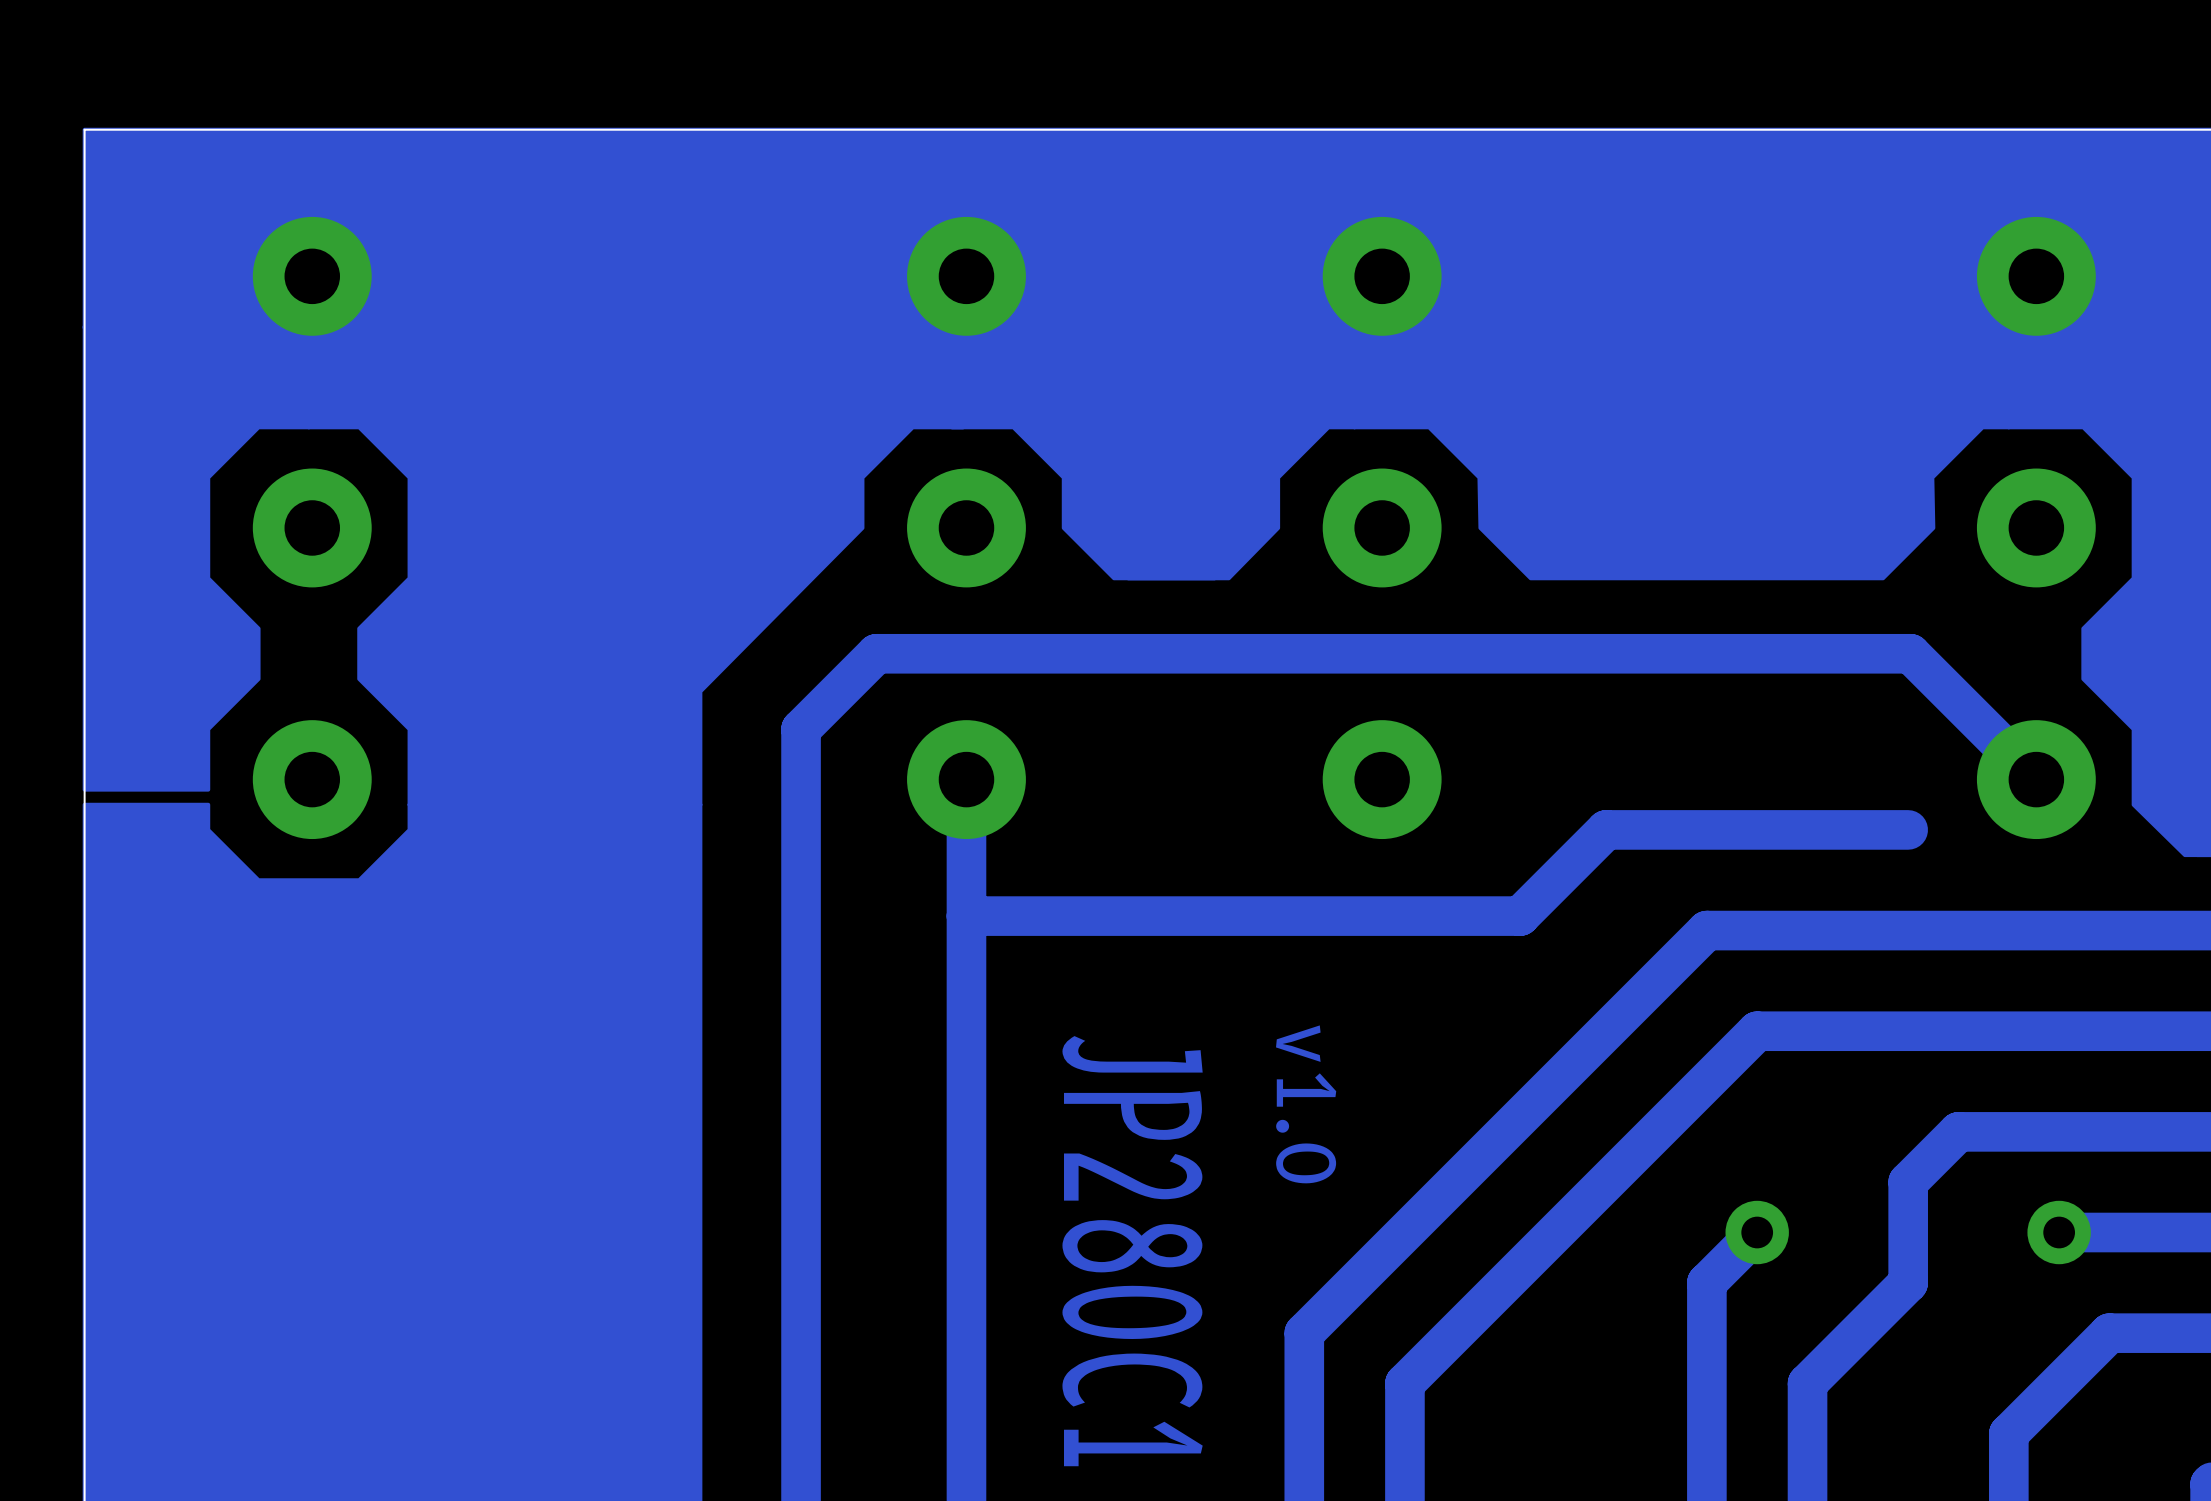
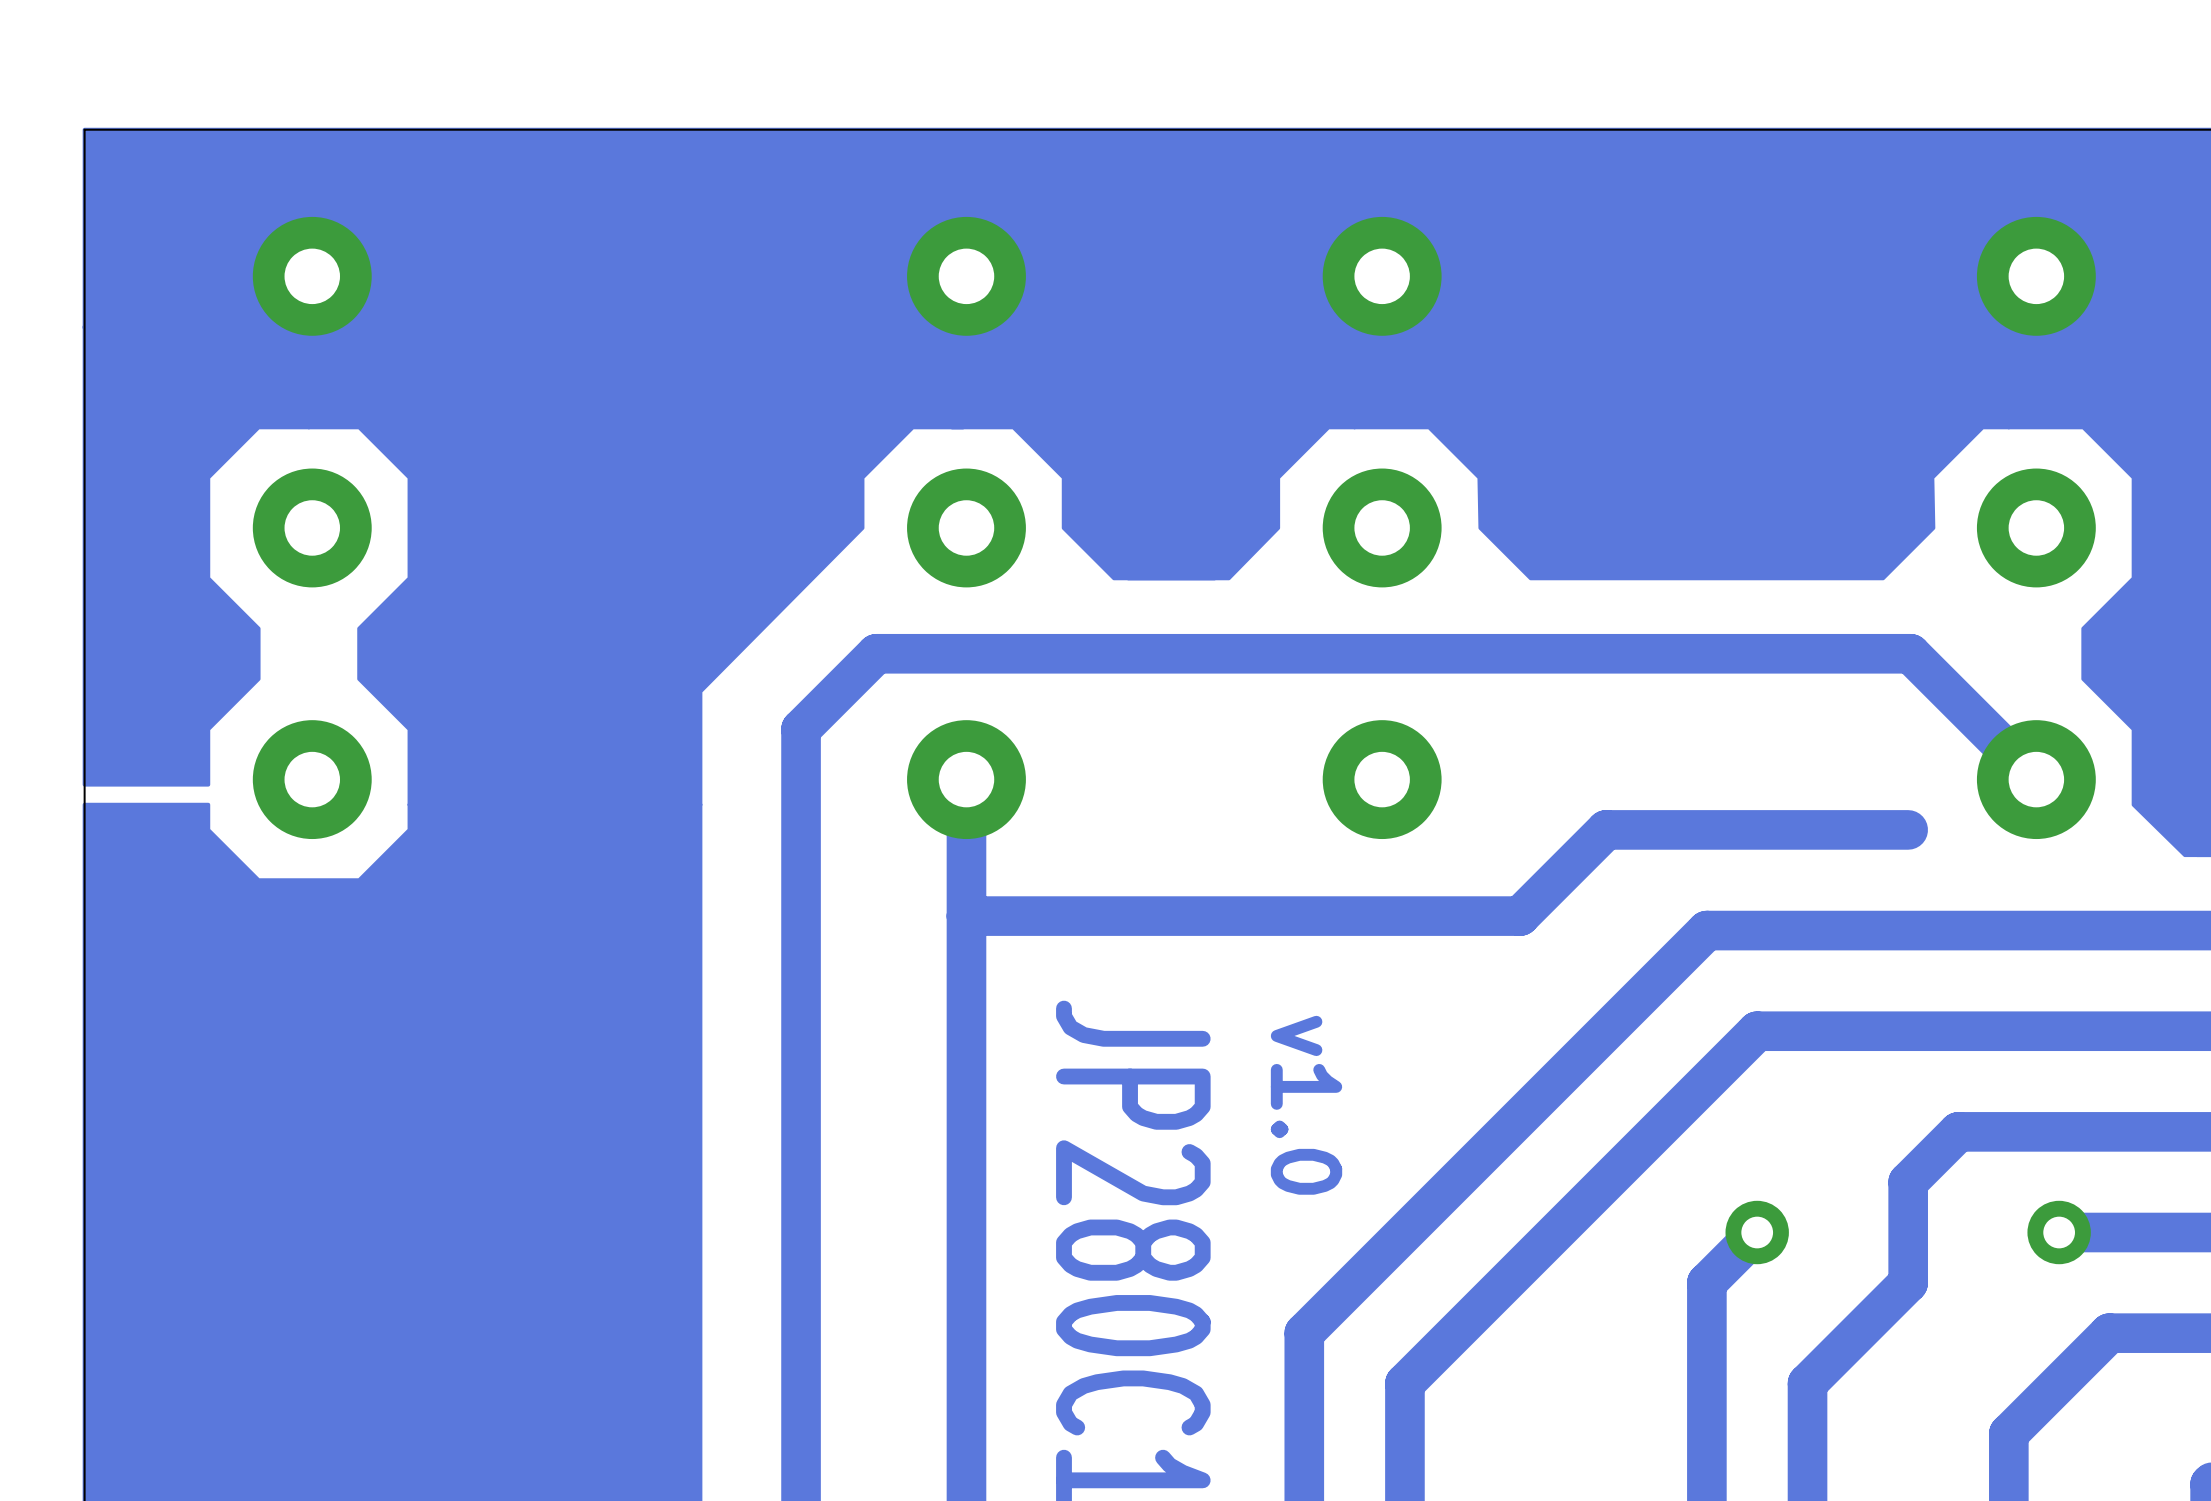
drawing shape: [82, 324, 311, 792] -> [82, 324, 311, 787]

